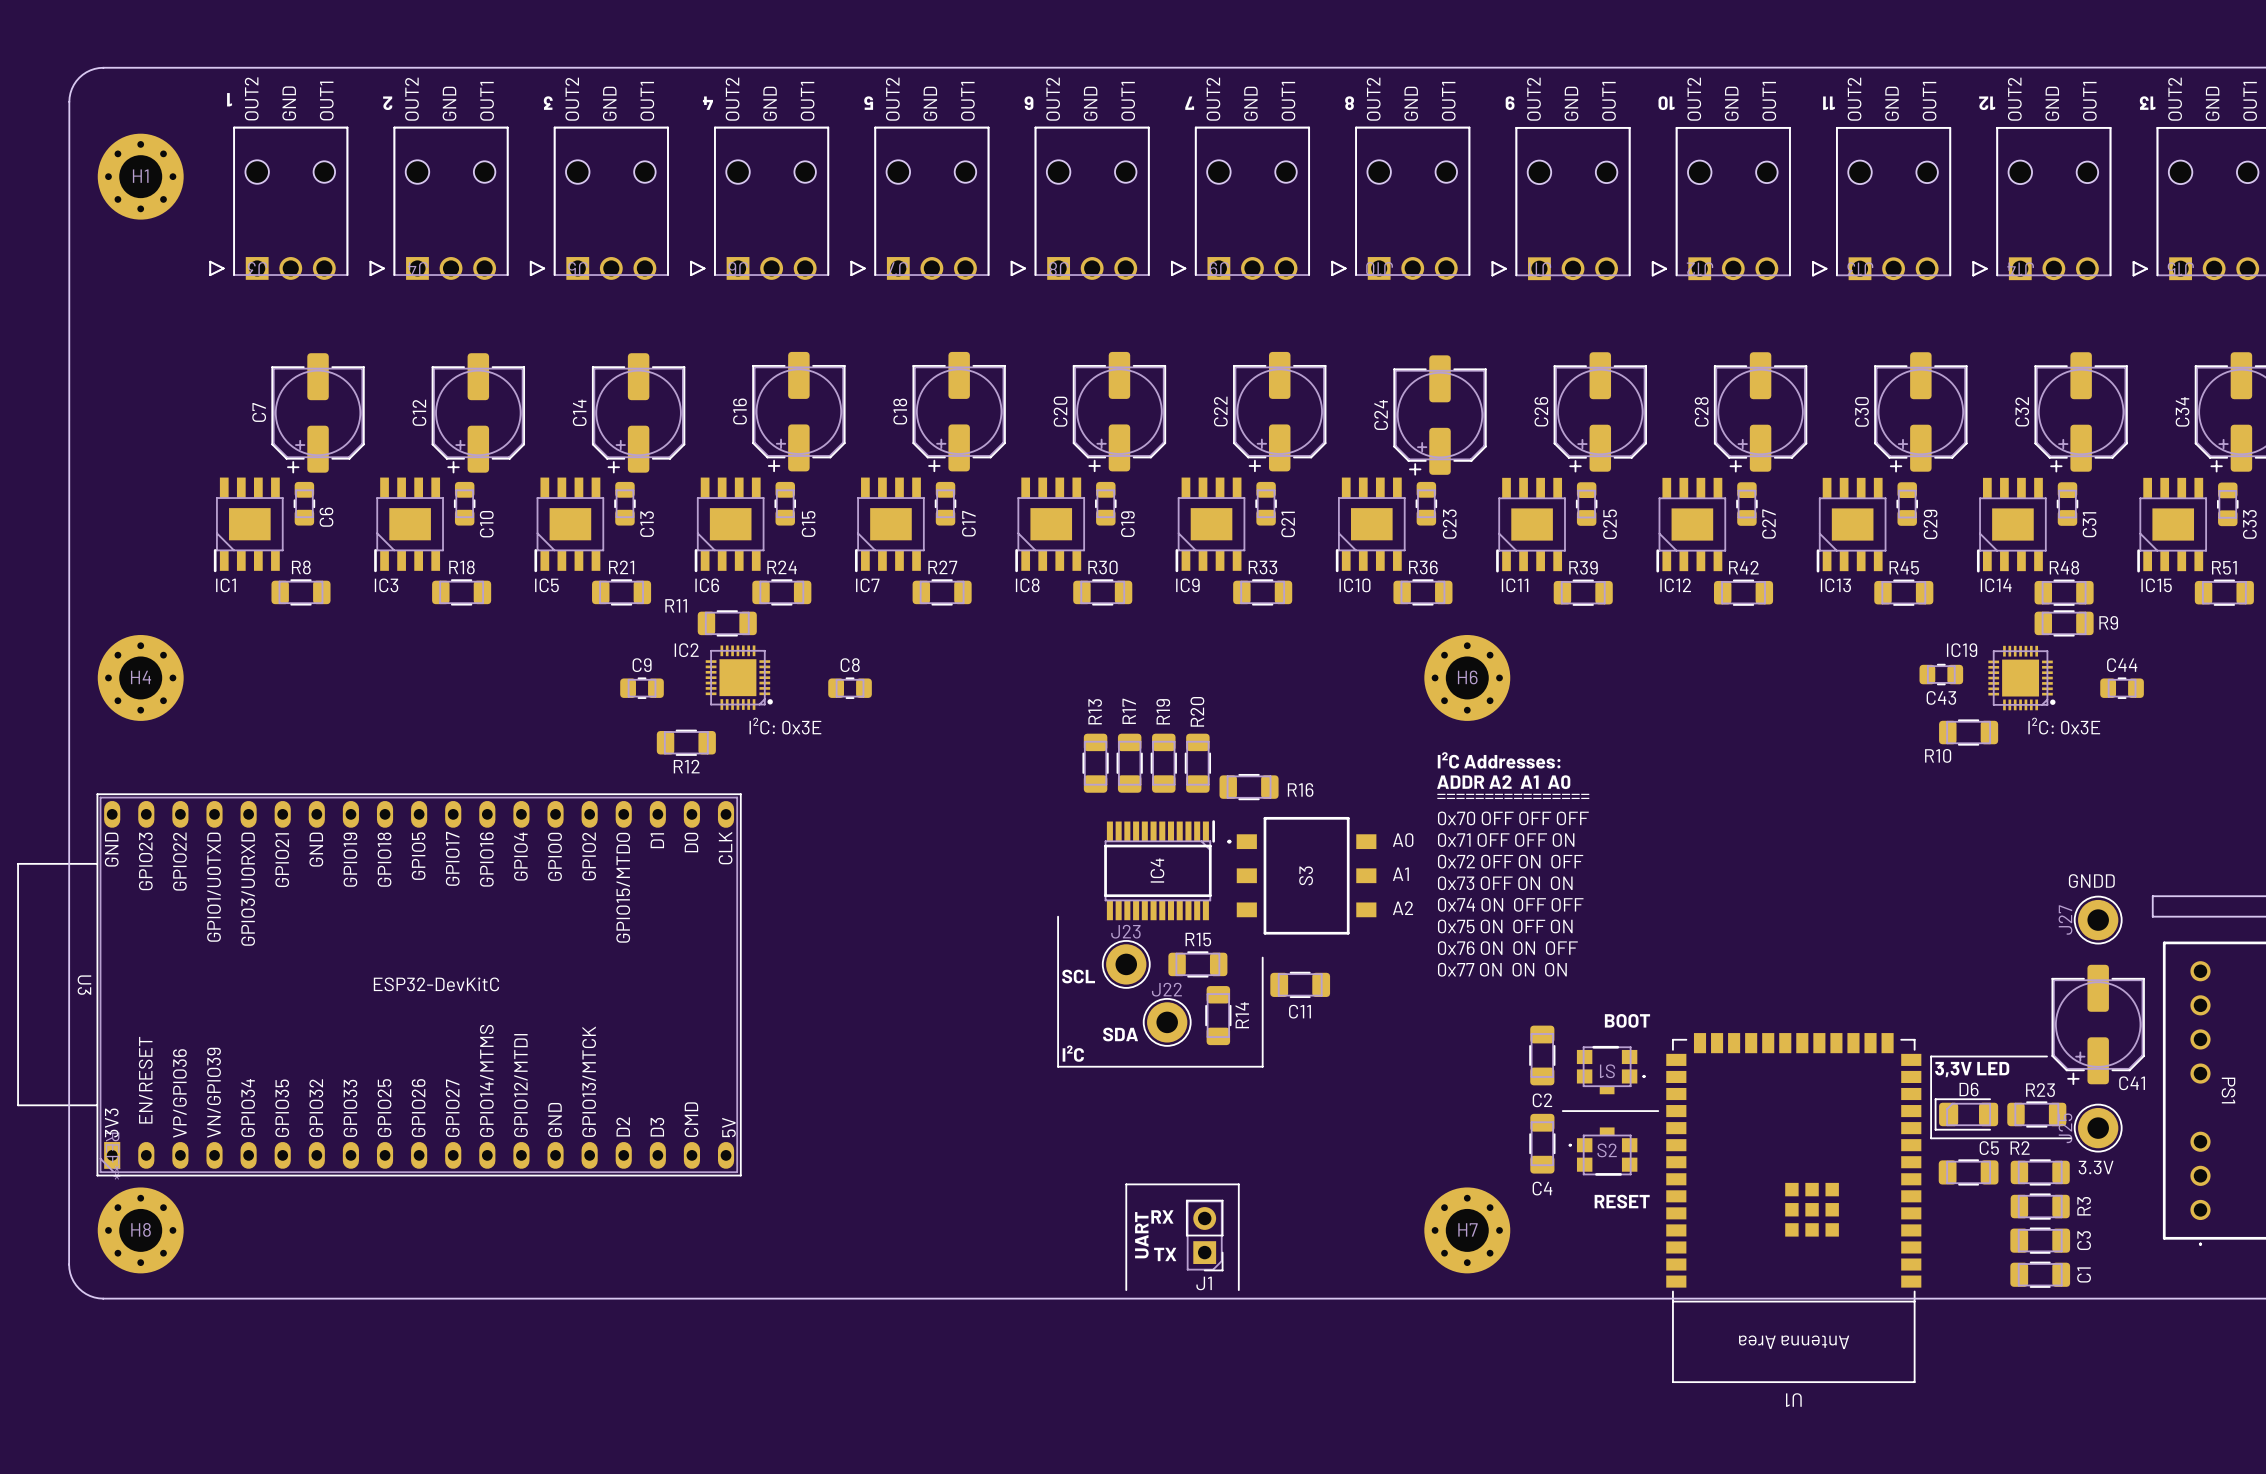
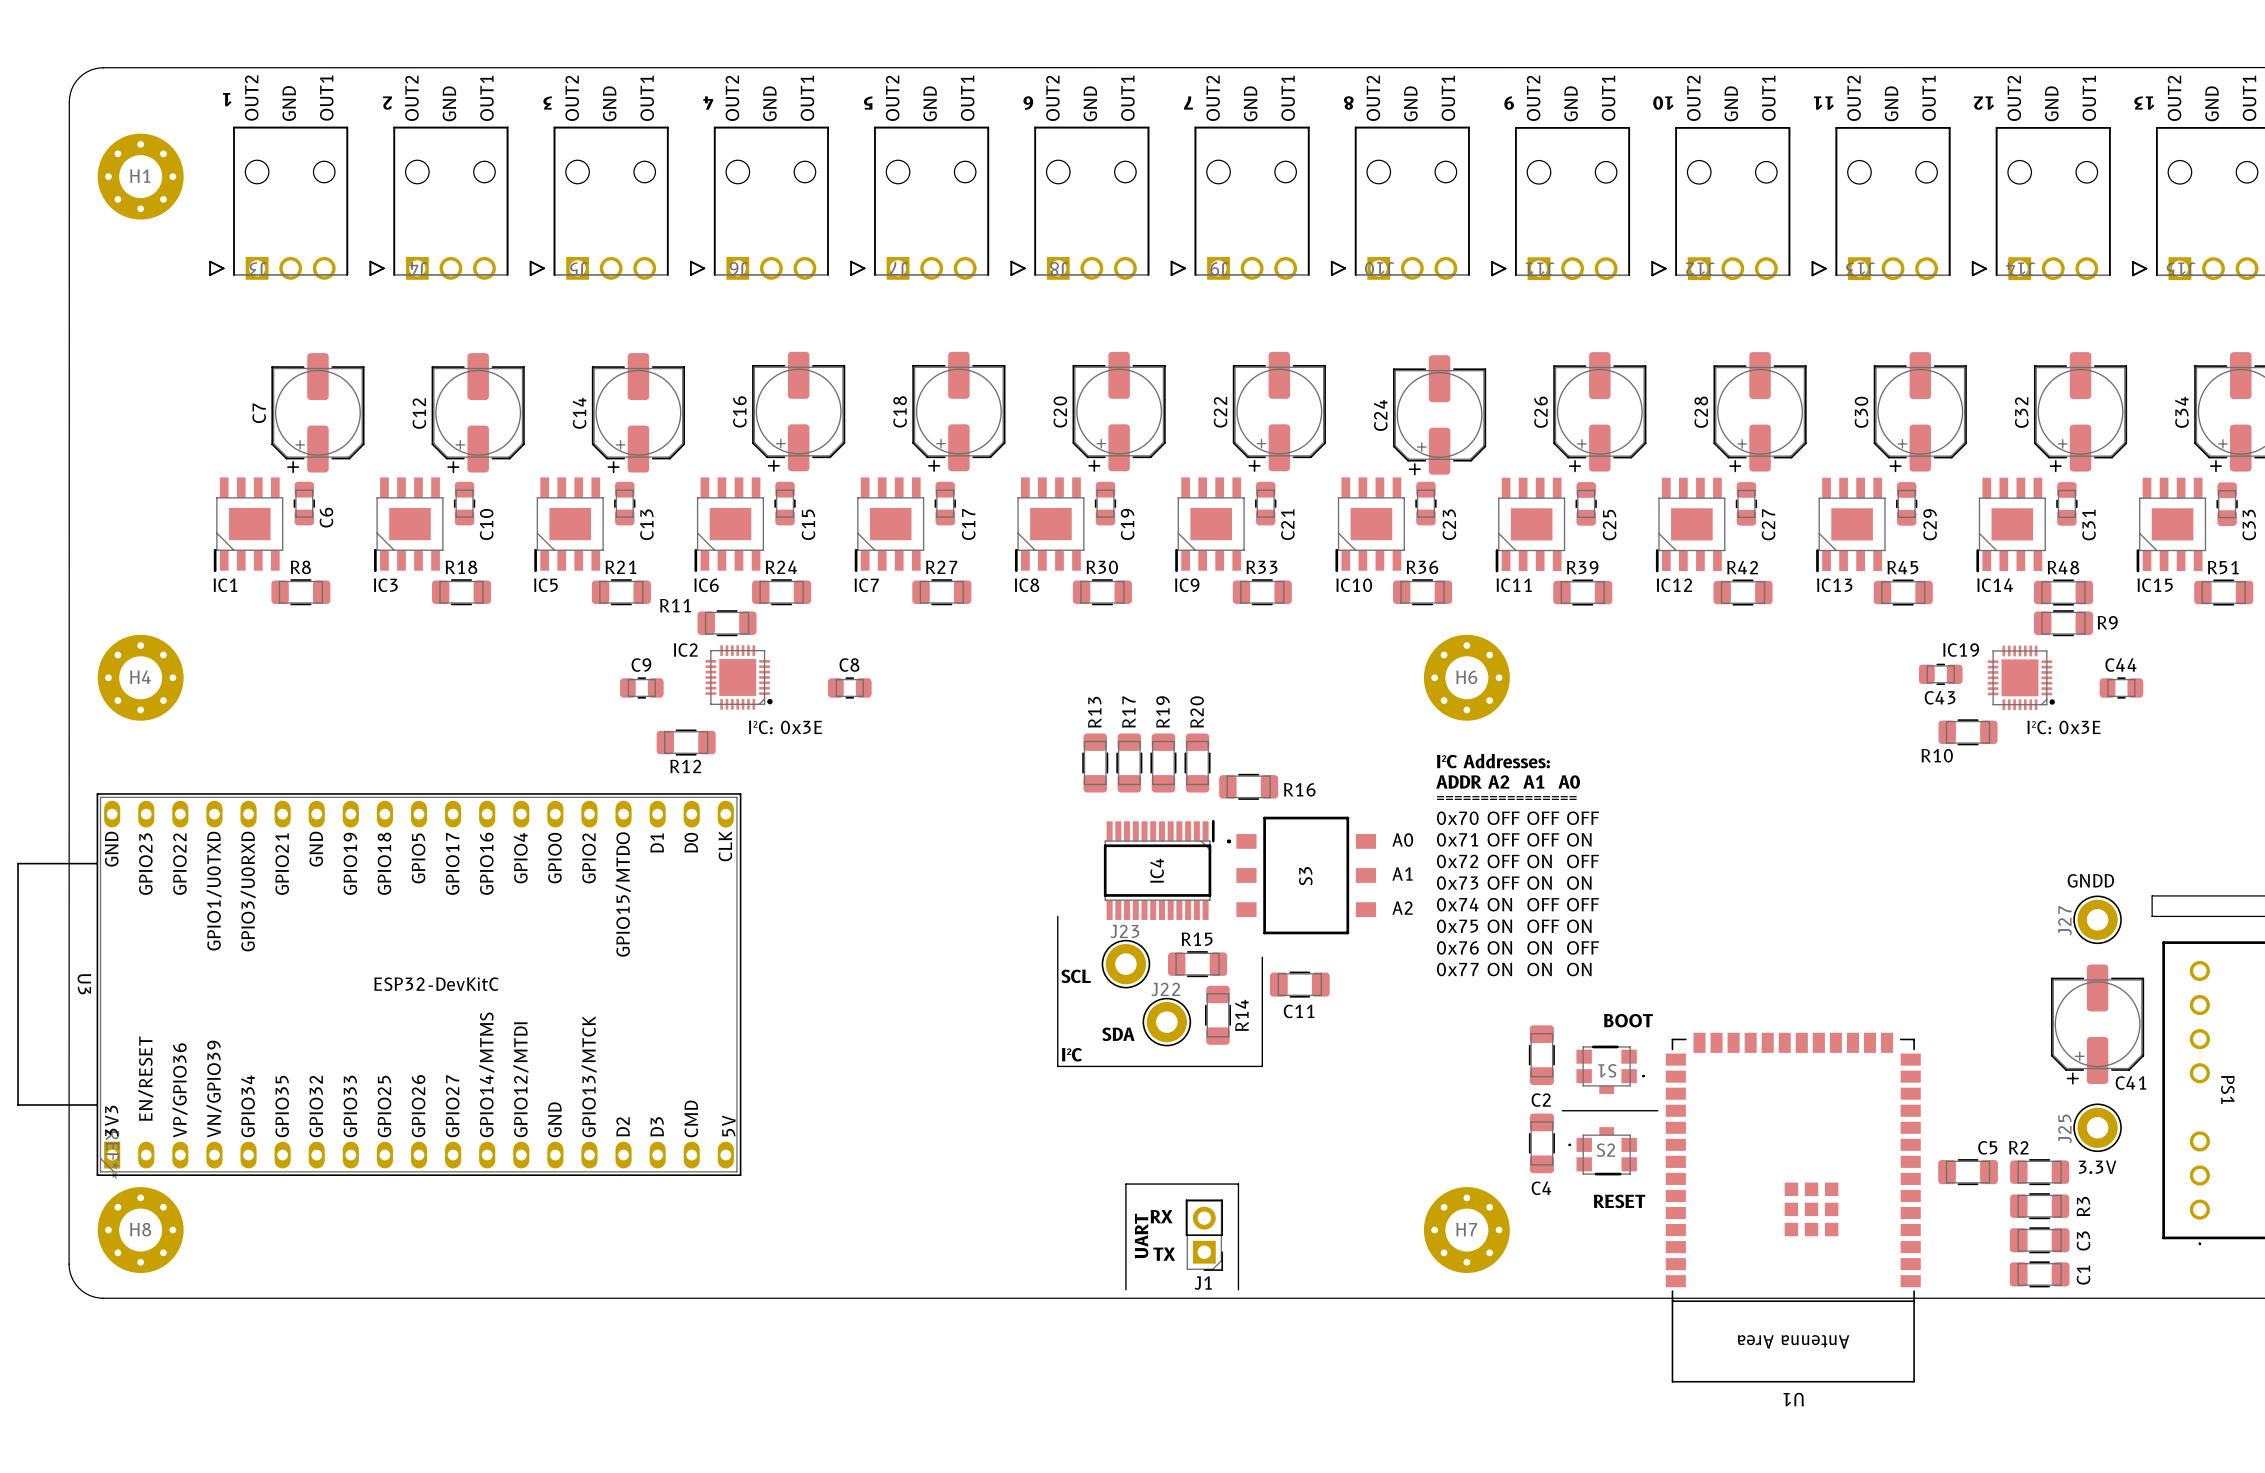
line: (2047, 1056) (1931, 1056) (1931, 1138) (2070, 1138) -> none
text: 3,3V LED (1972, 1069) -> none
D6: (1966, 1114) -> none
R23: (2036, 1114) -> none

